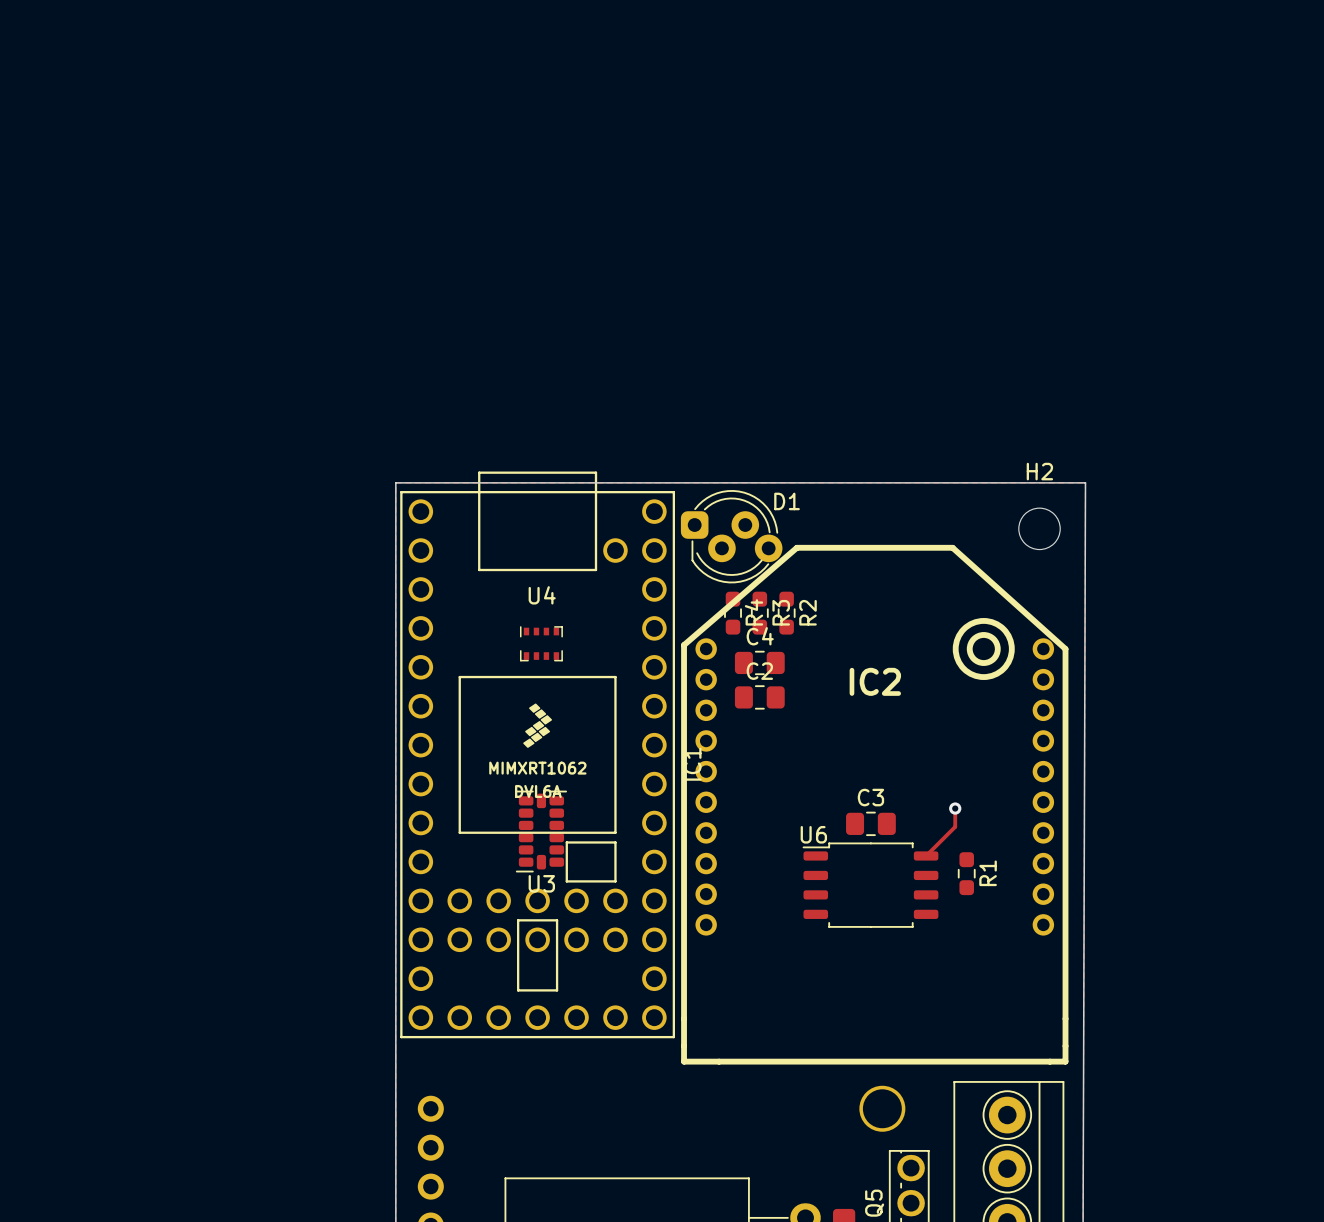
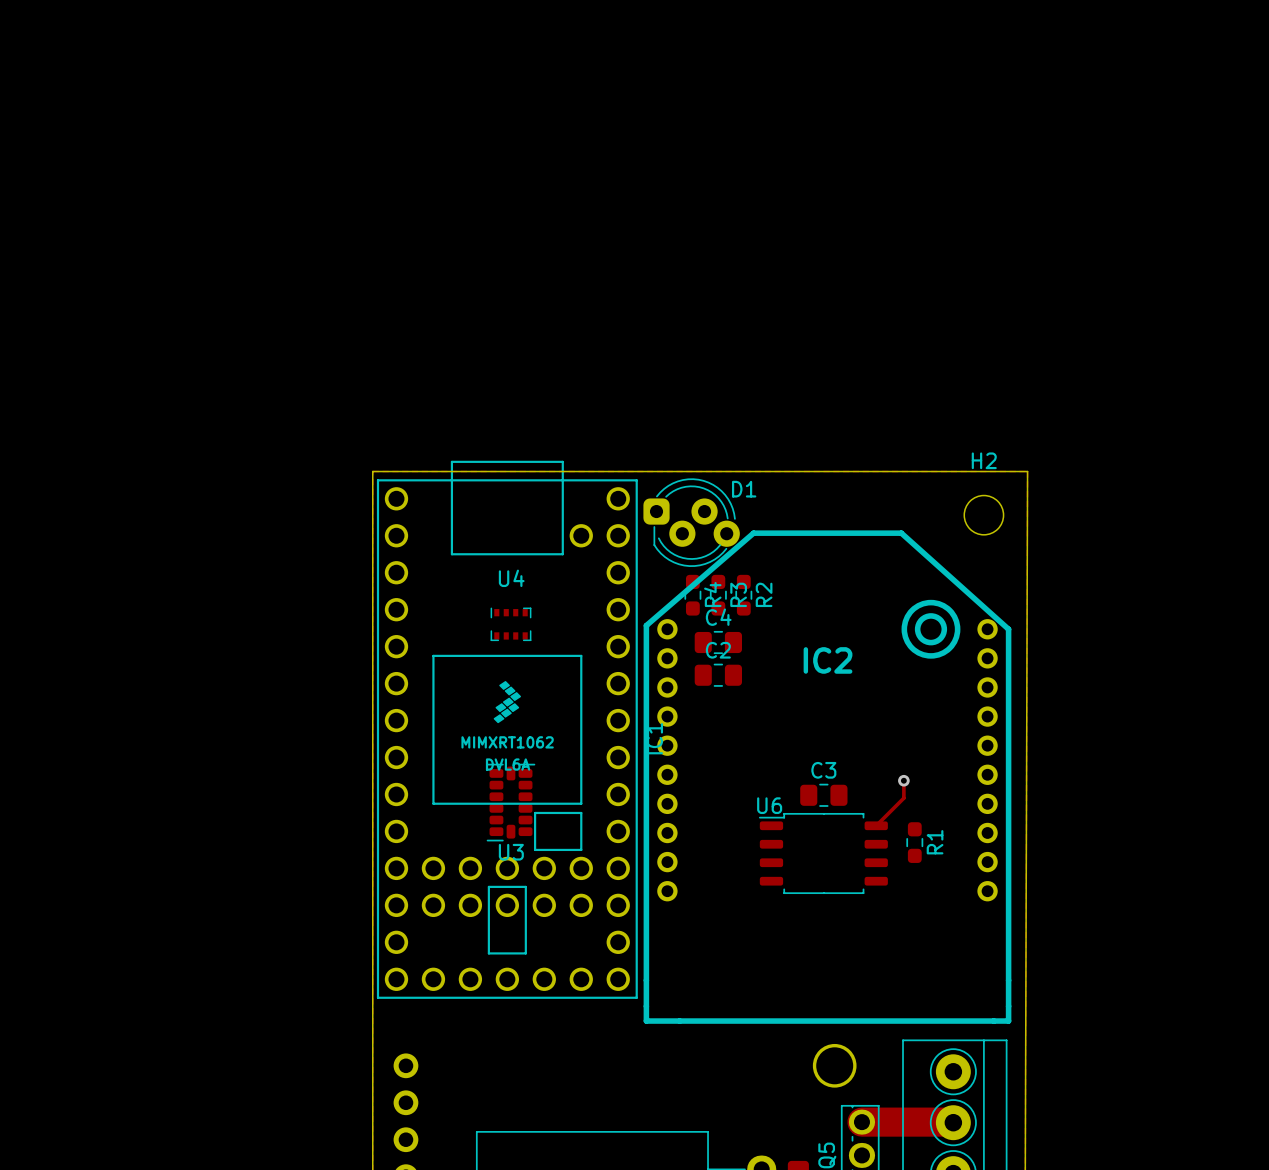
track: none -> (861, 1122) (952, 1122)

